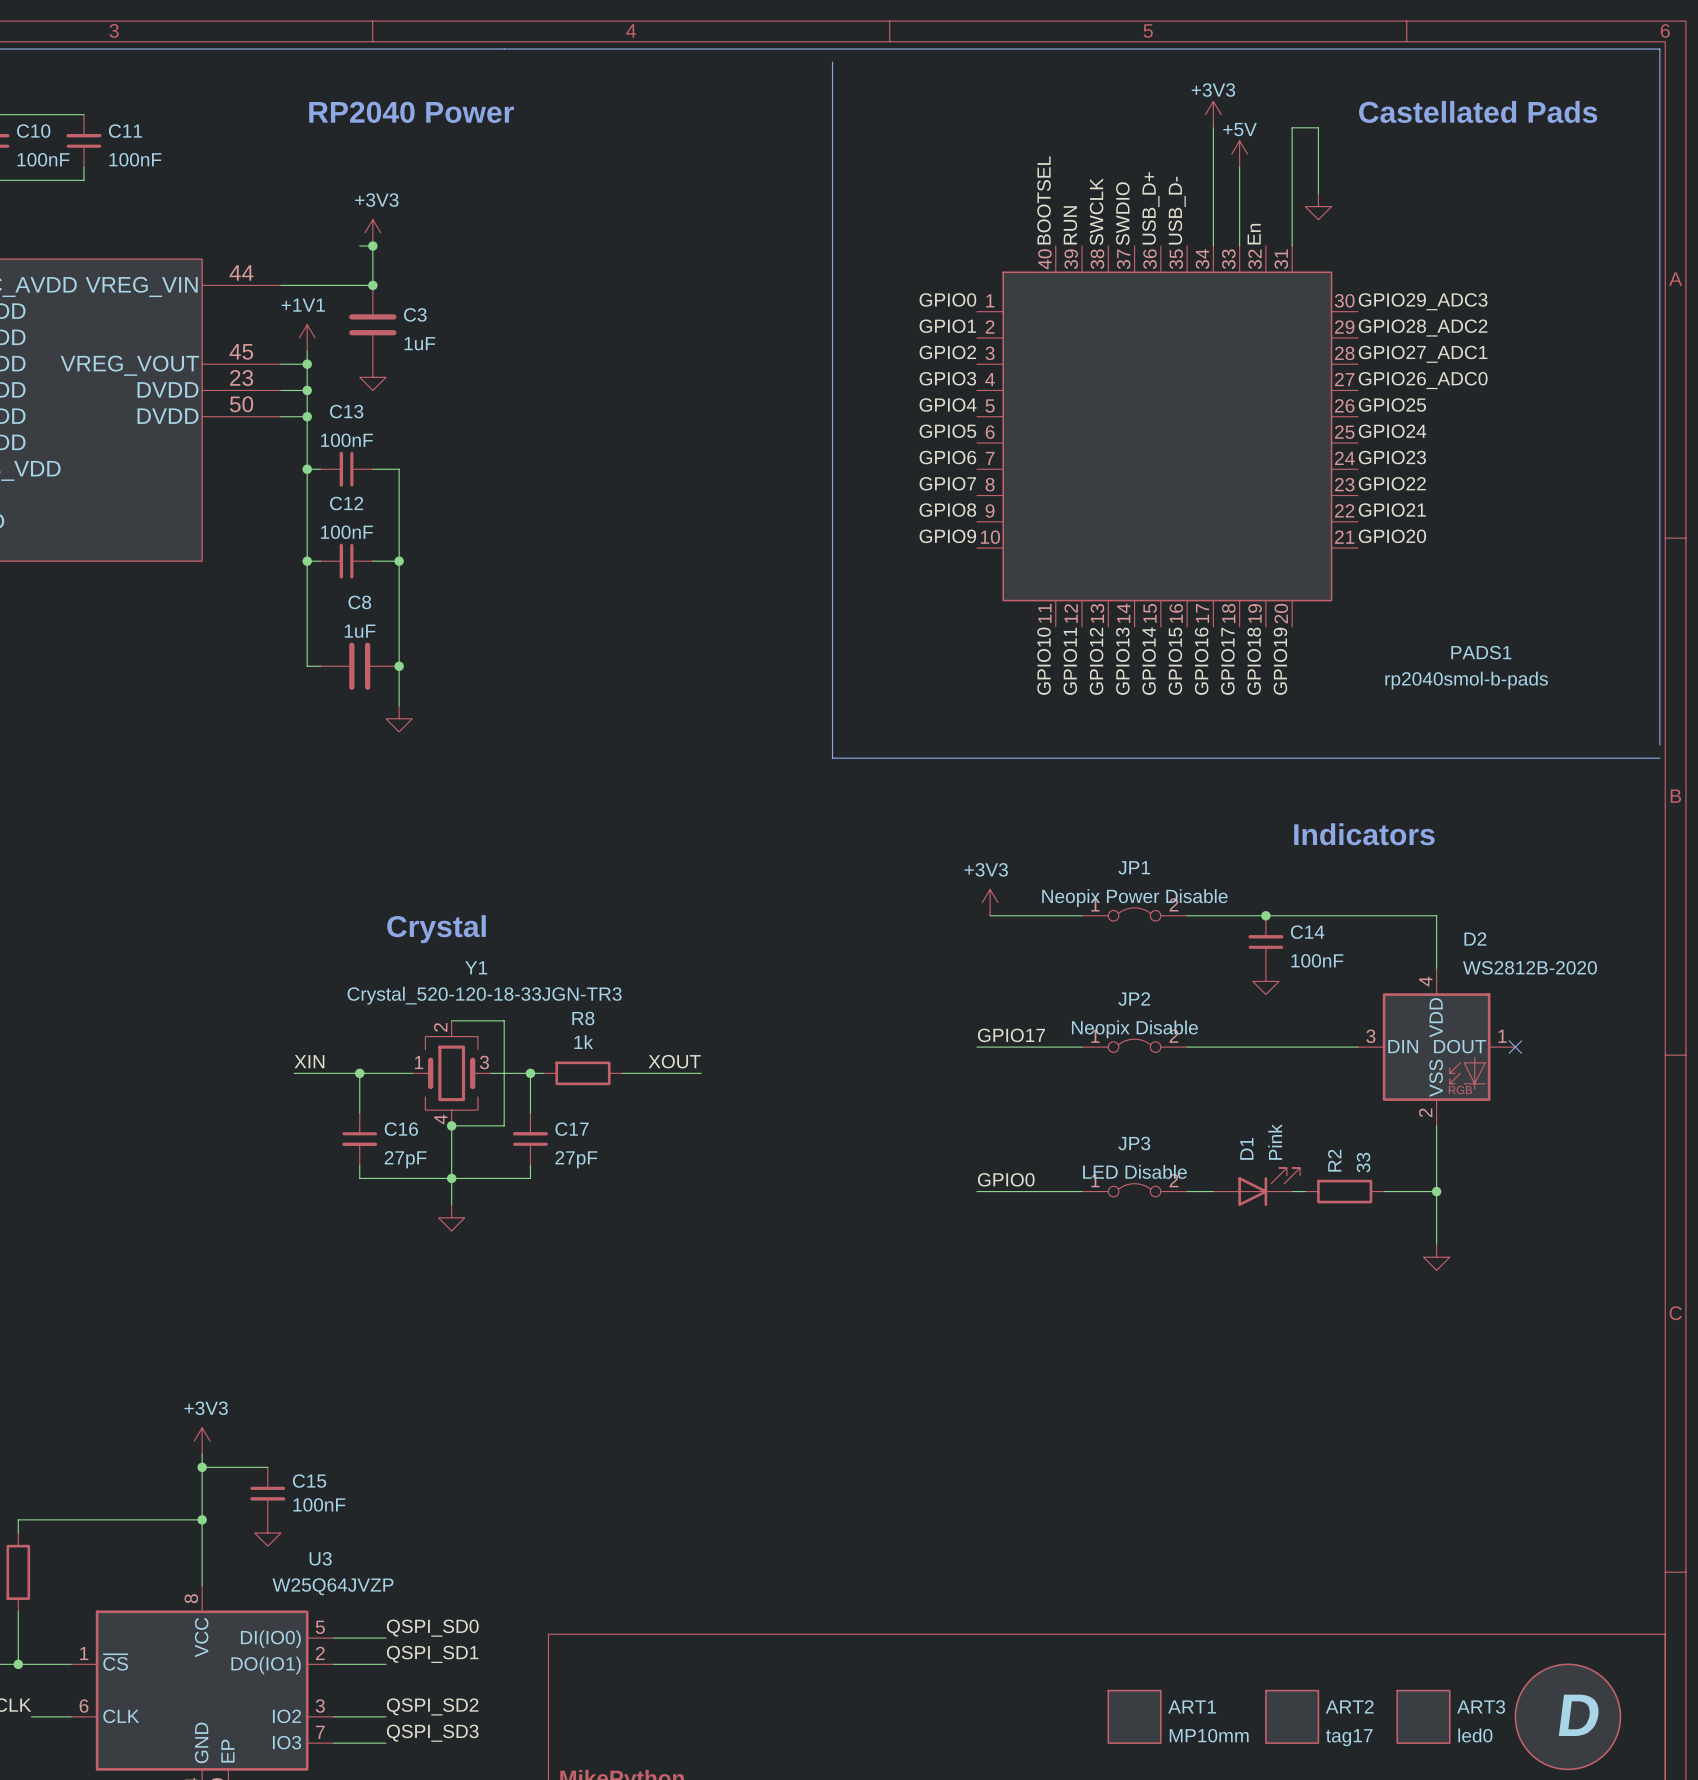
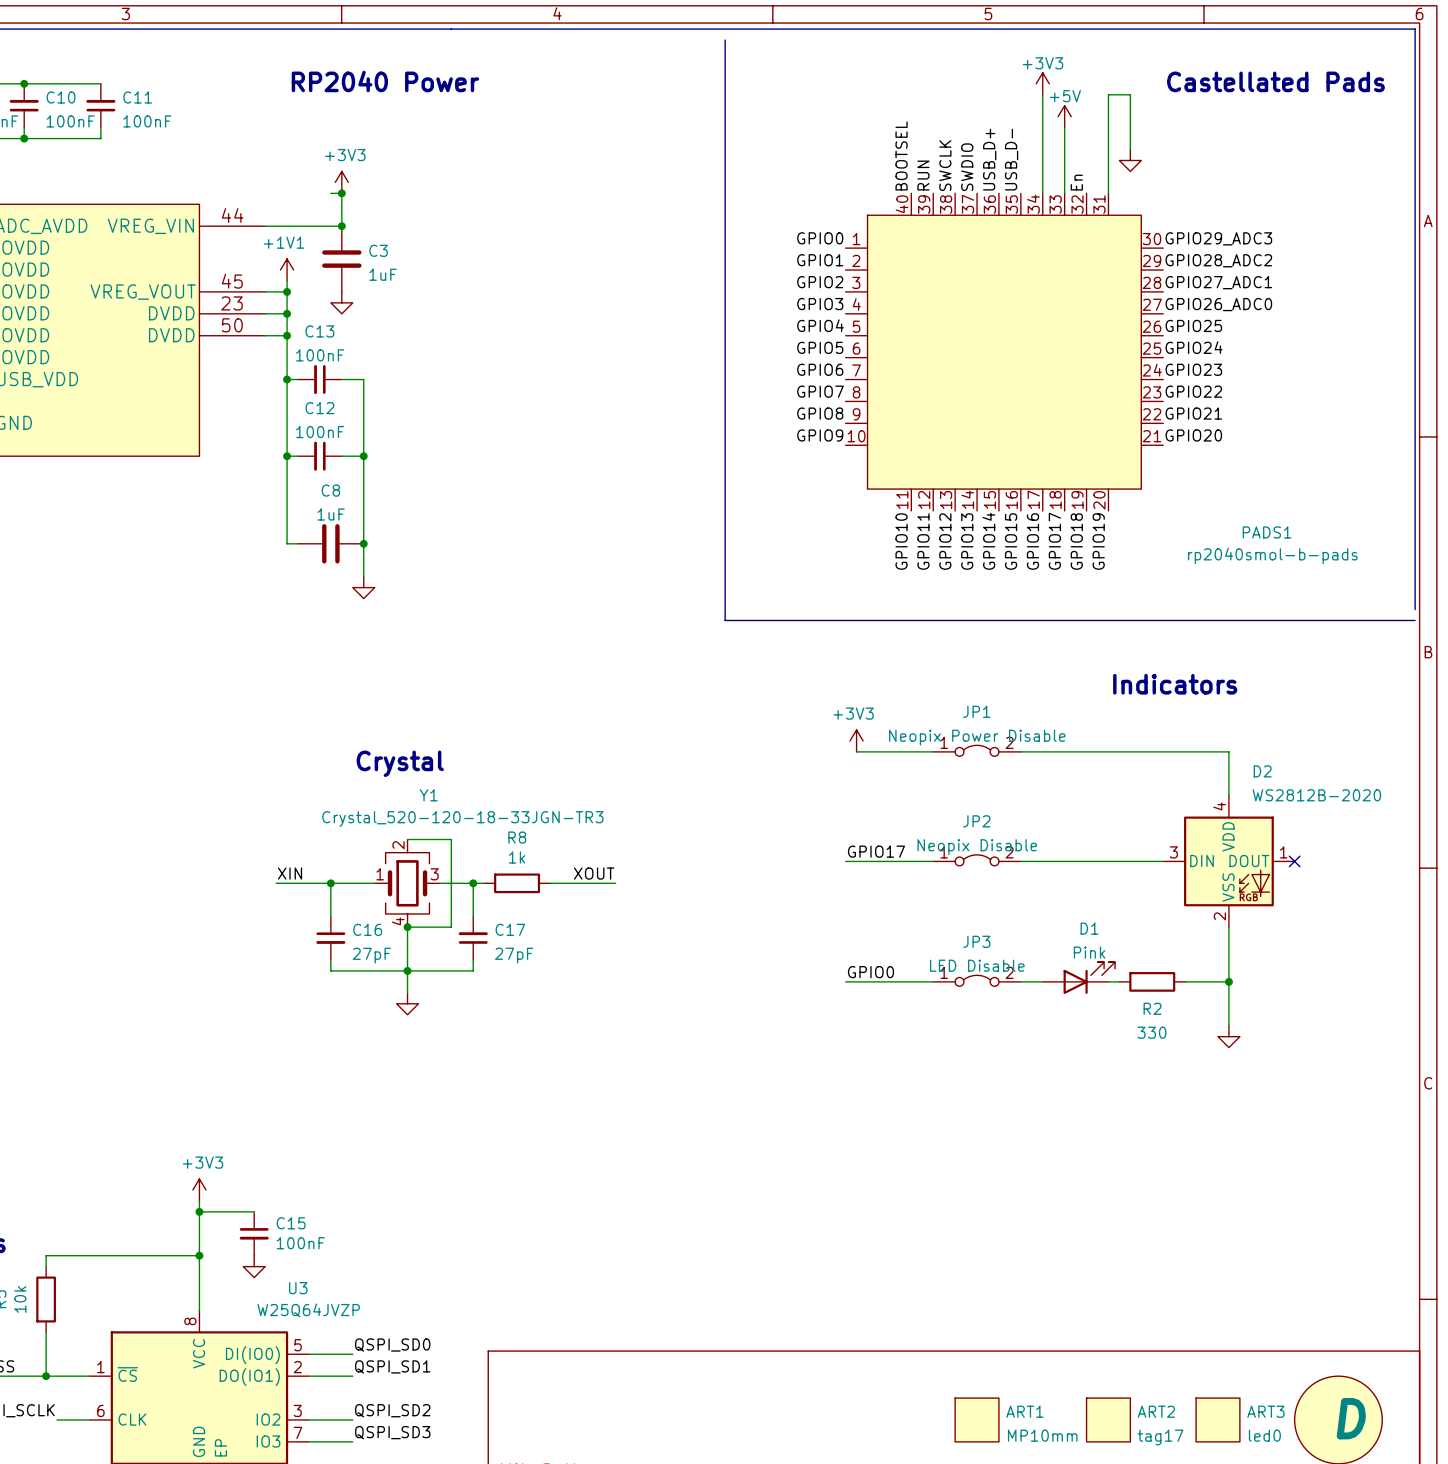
junction: (1265, 915) -> none
C14: 100nF (1265, 942) -> none
power symbol: (1265, 981) -> none
D1 value rotation: 0° (1275, 1141) -> 90° clockwise (1089, 952)
D1 name rotation: 0° (1246, 1148) -> 90° clockwise (1089, 928)
R2 name rotation: 0° (1334, 1160) -> 90° clockwise (1152, 1008)
R2 name position: R2 (1334, 1160) -> R2 (1152, 1008)
R2 value: 33 (1363, 1162) -> 330 (1152, 1032)

